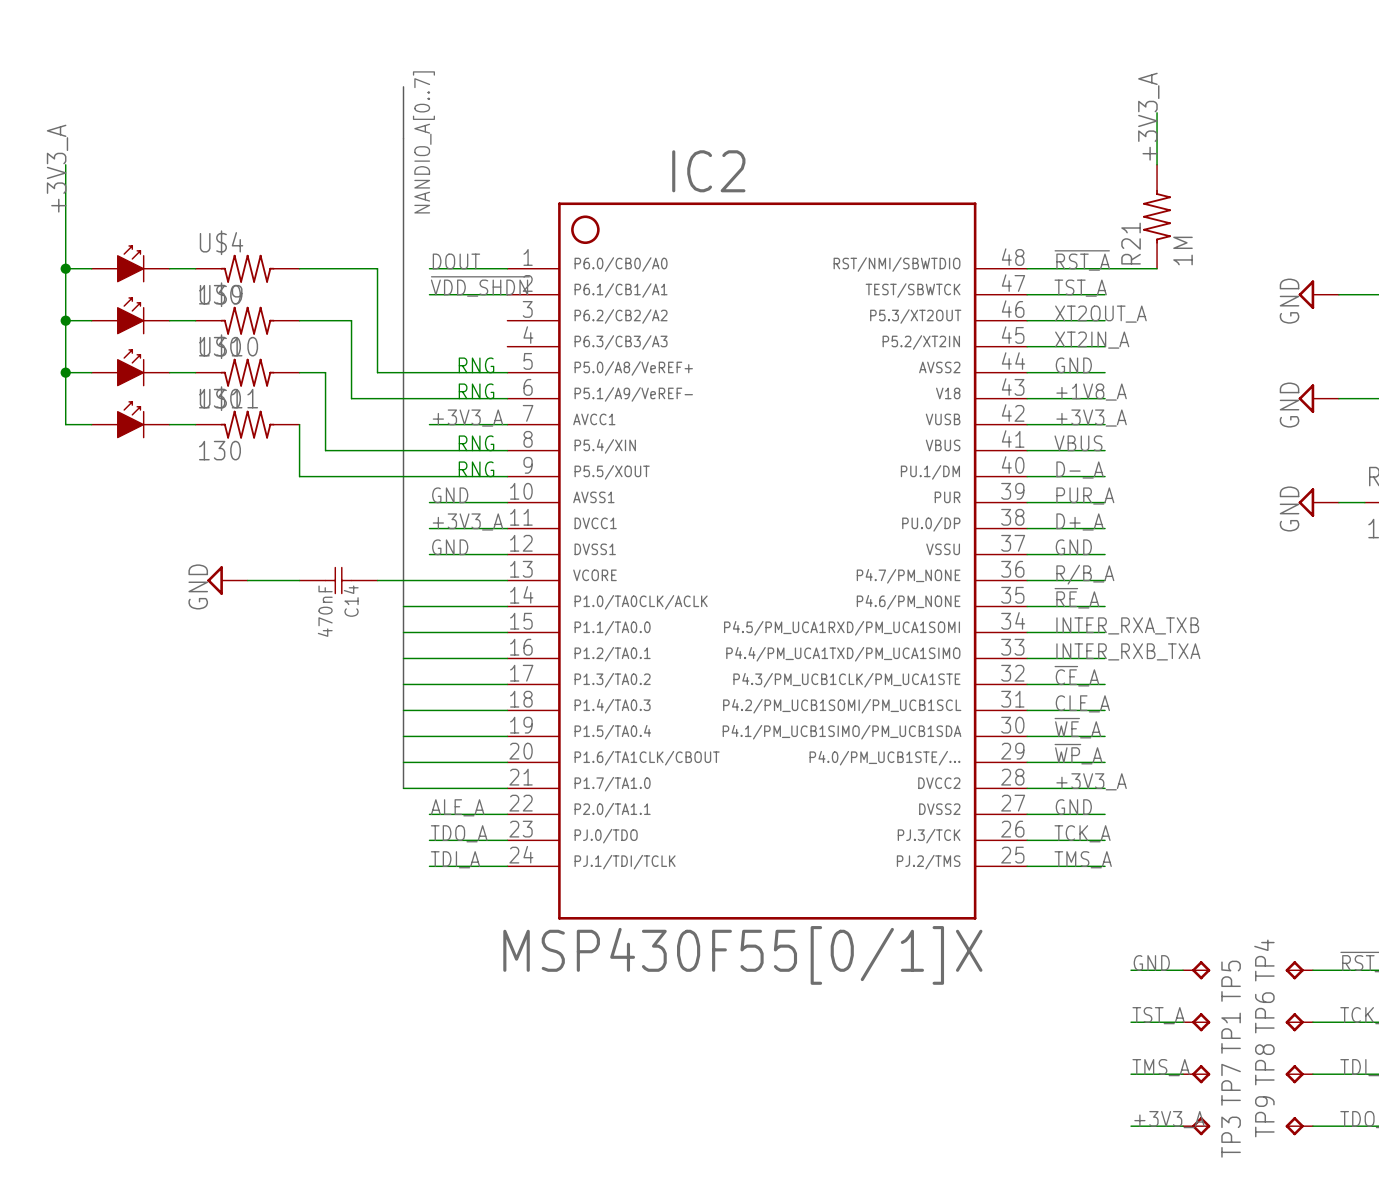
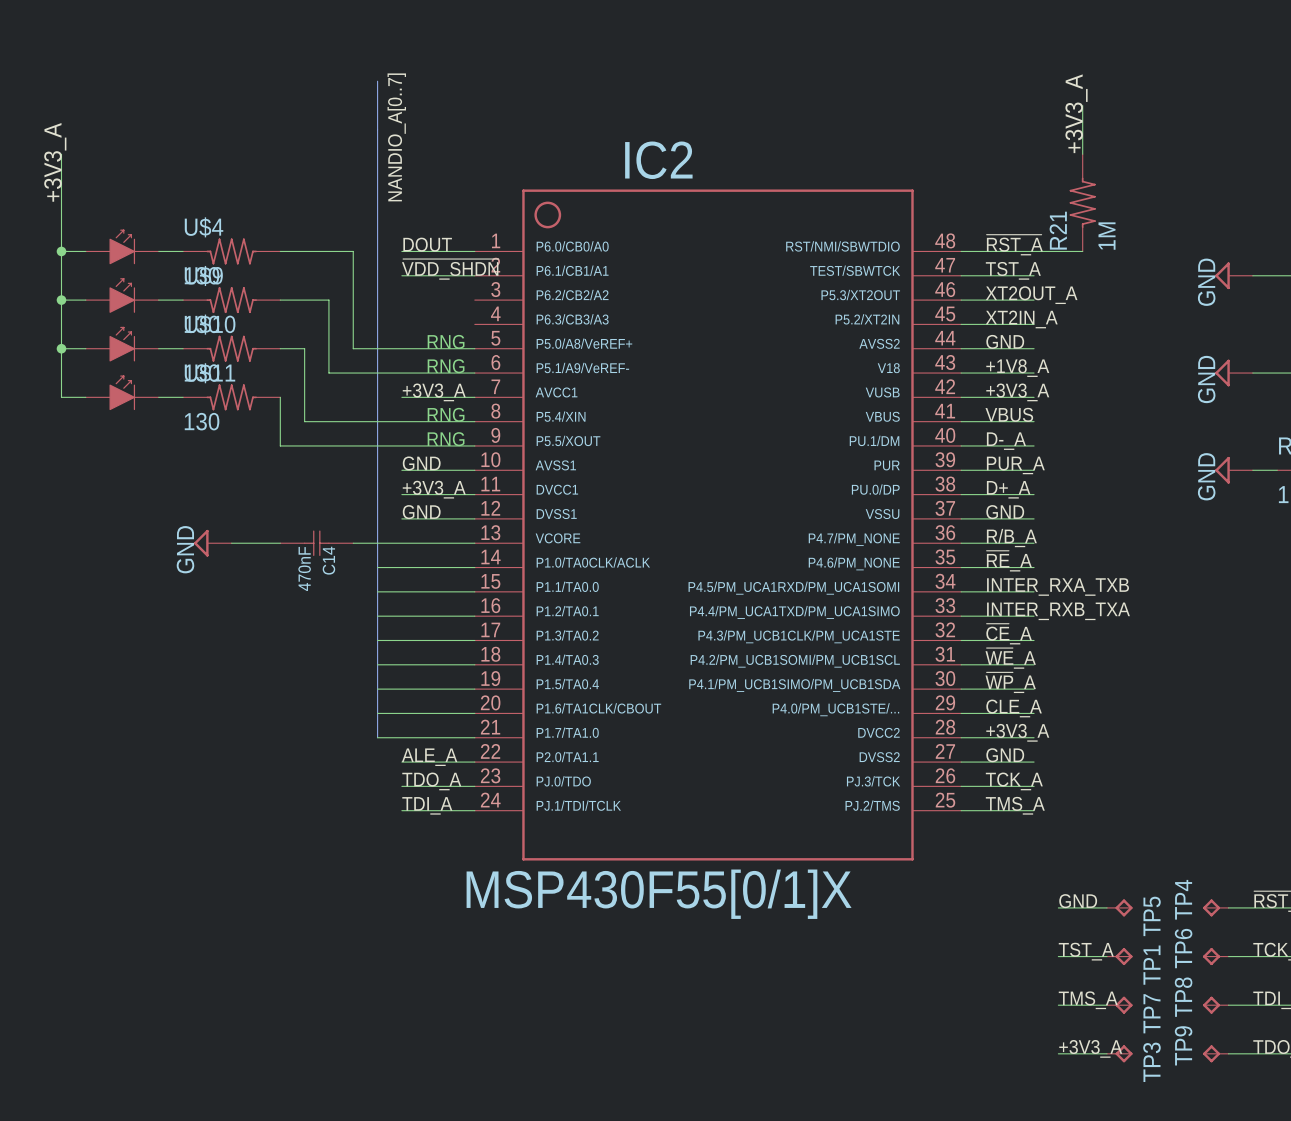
label: CLE_A (1082, 703) -> ~{WE}_A (1010, 658)
label: ~{WE}_A (1077, 728) -> ~{WP}_A (1010, 682)
label: ~{WP}_A (1078, 754) -> CLE_A (1014, 708)

